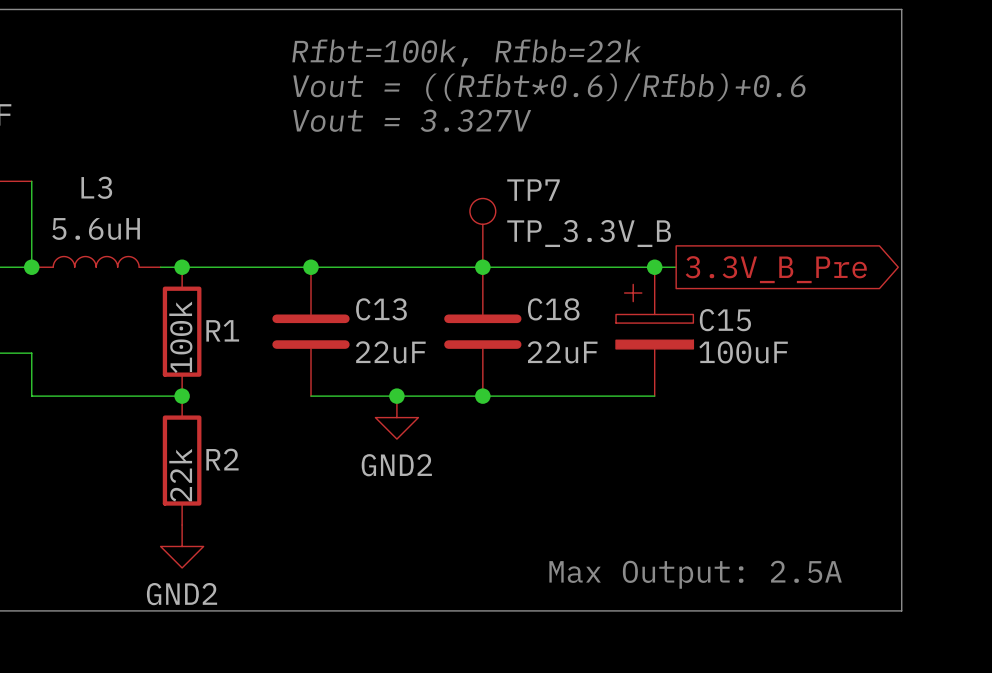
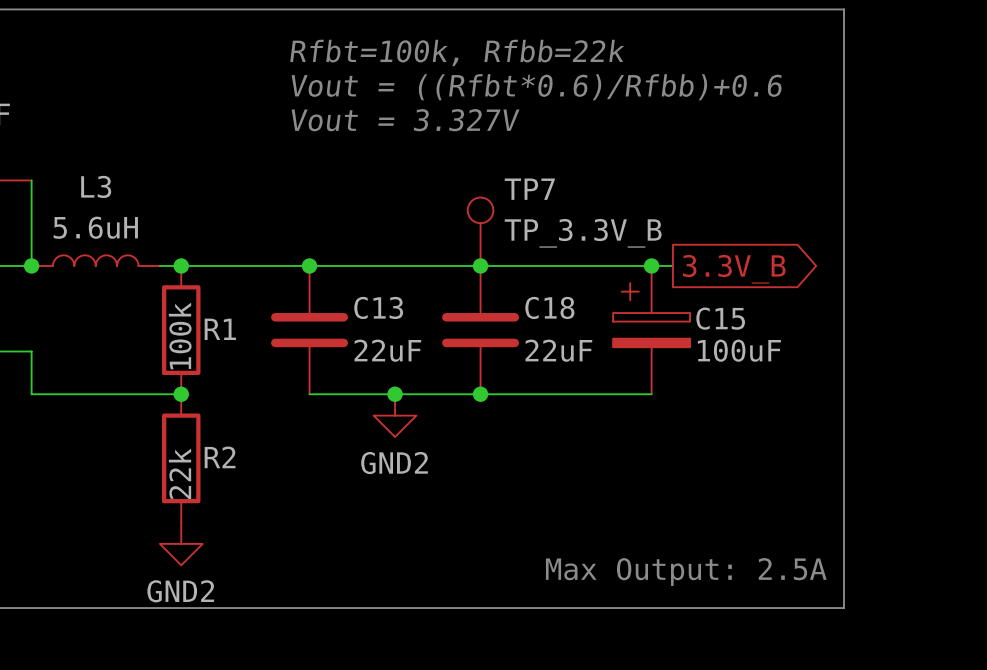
line: (848, 9) (901, 9) (901, 610) (848, 610) -> (844, 9) (844, 608)
global label: 3.3V_B_Pre (776, 269) -> 3.3V_B (734, 269)

